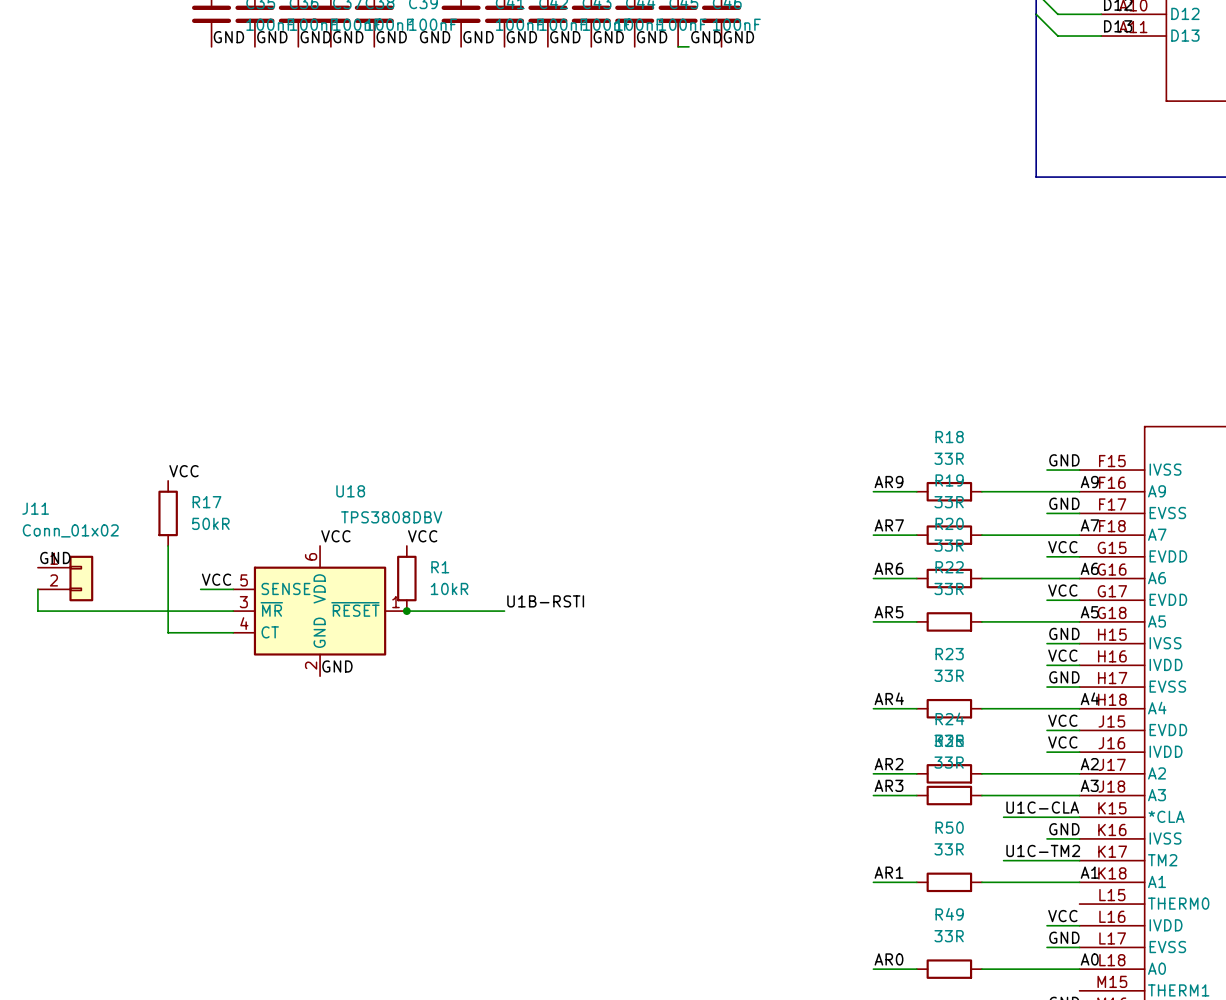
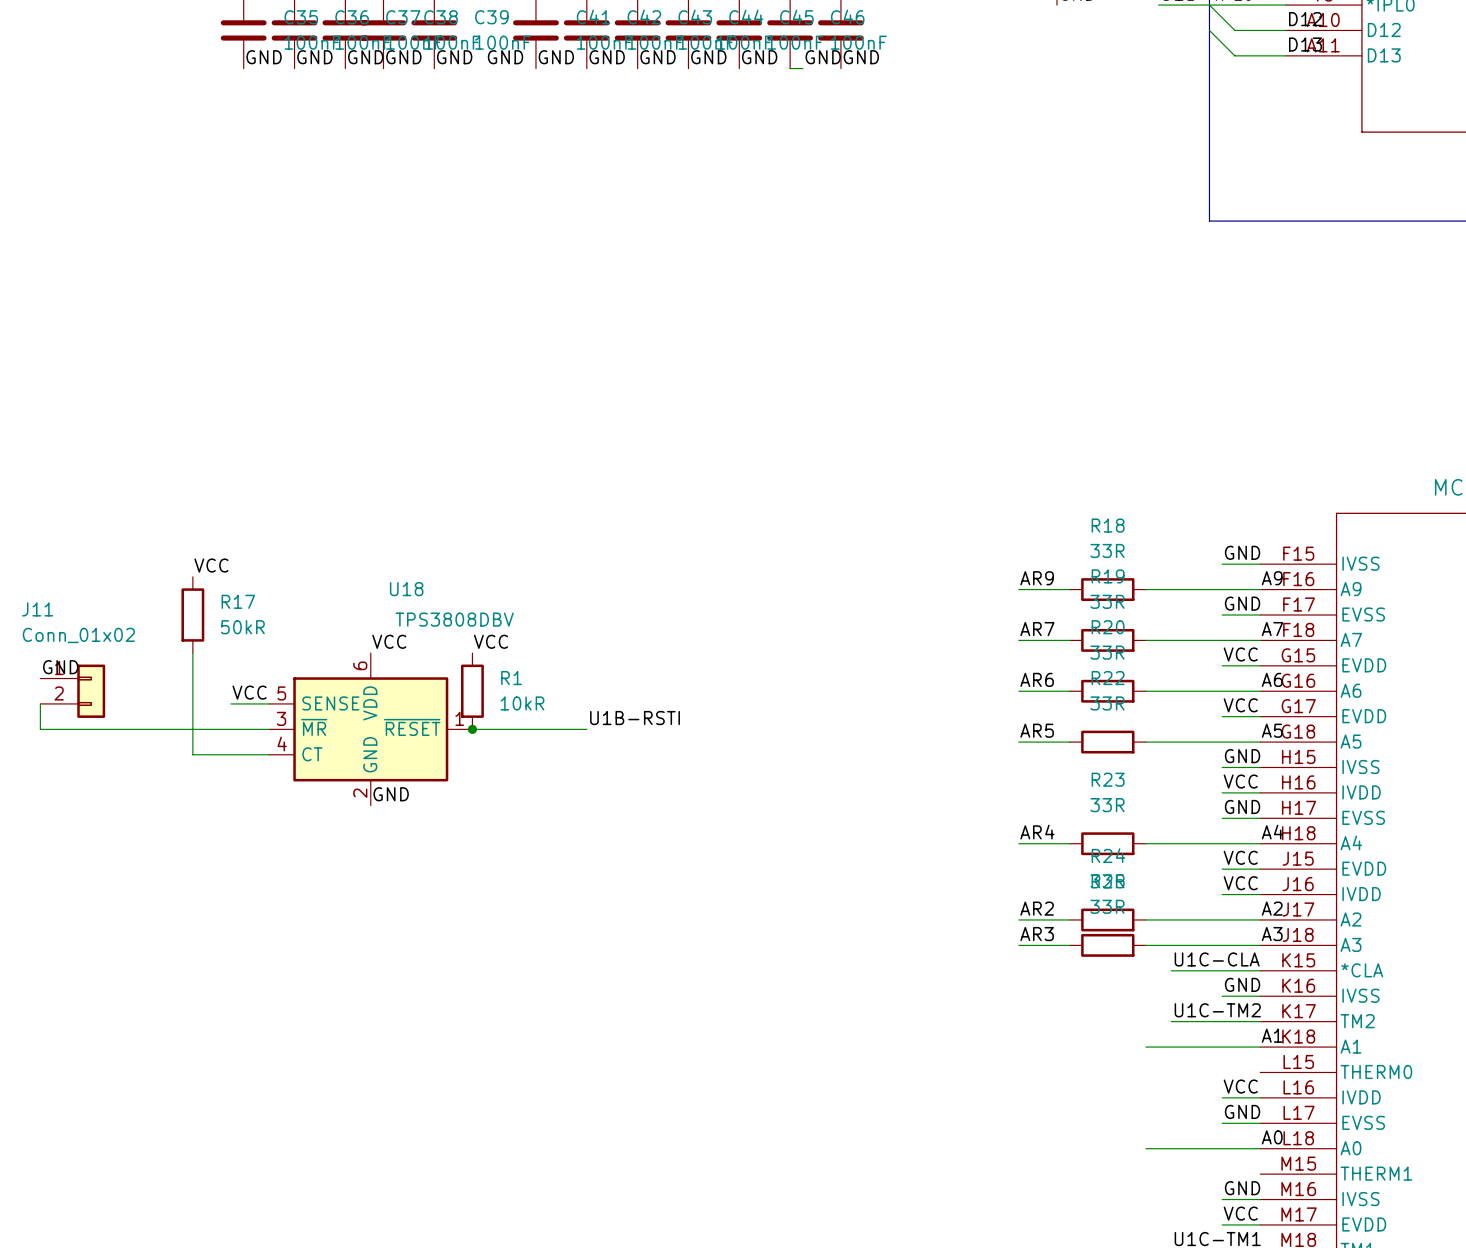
label: AR1 (888, 872) -> none
wire: (873, 882) (916, 882) -> none
R50: 33R (949, 882) -> none
label: AR0 (888, 959) -> none
wire: (873, 969) (916, 969) -> none
R49: 33R (949, 969) -> none

